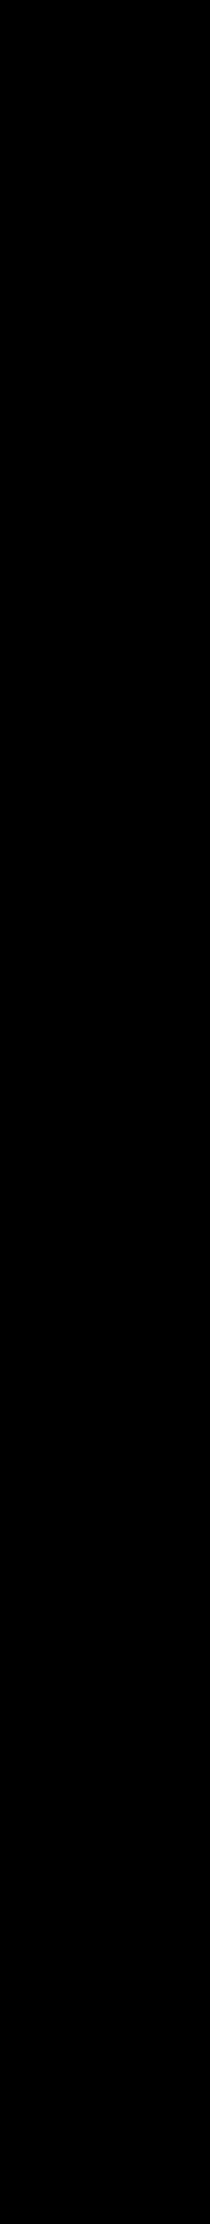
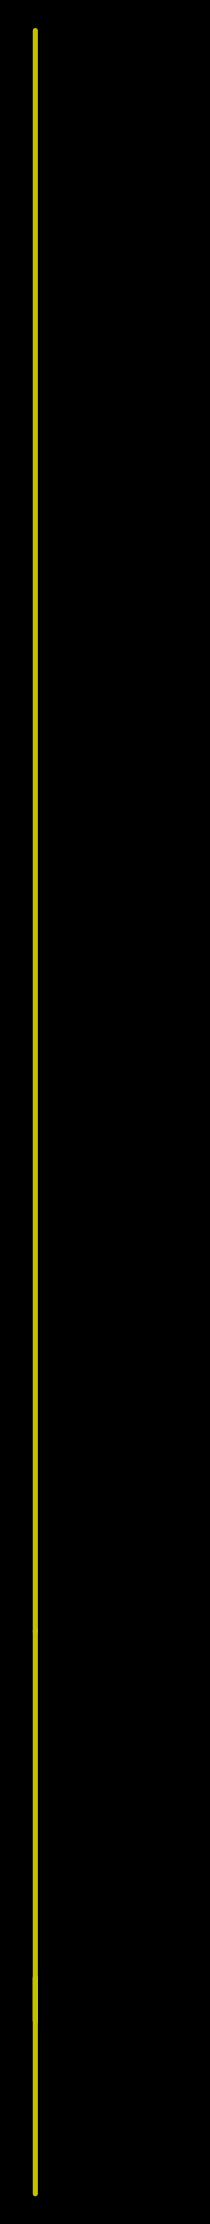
board edge: none -> (35, 30) (35, 2193)

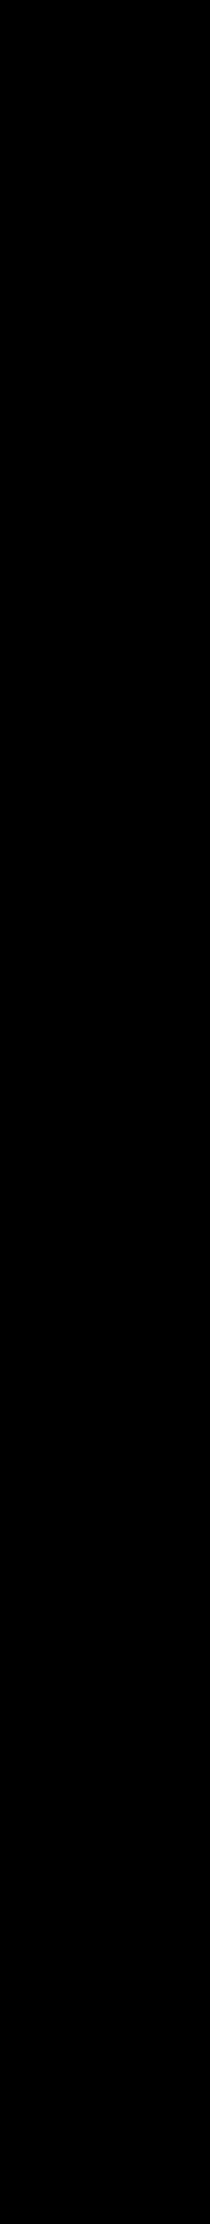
board edge: (35, 30) (35, 2193) -> none

